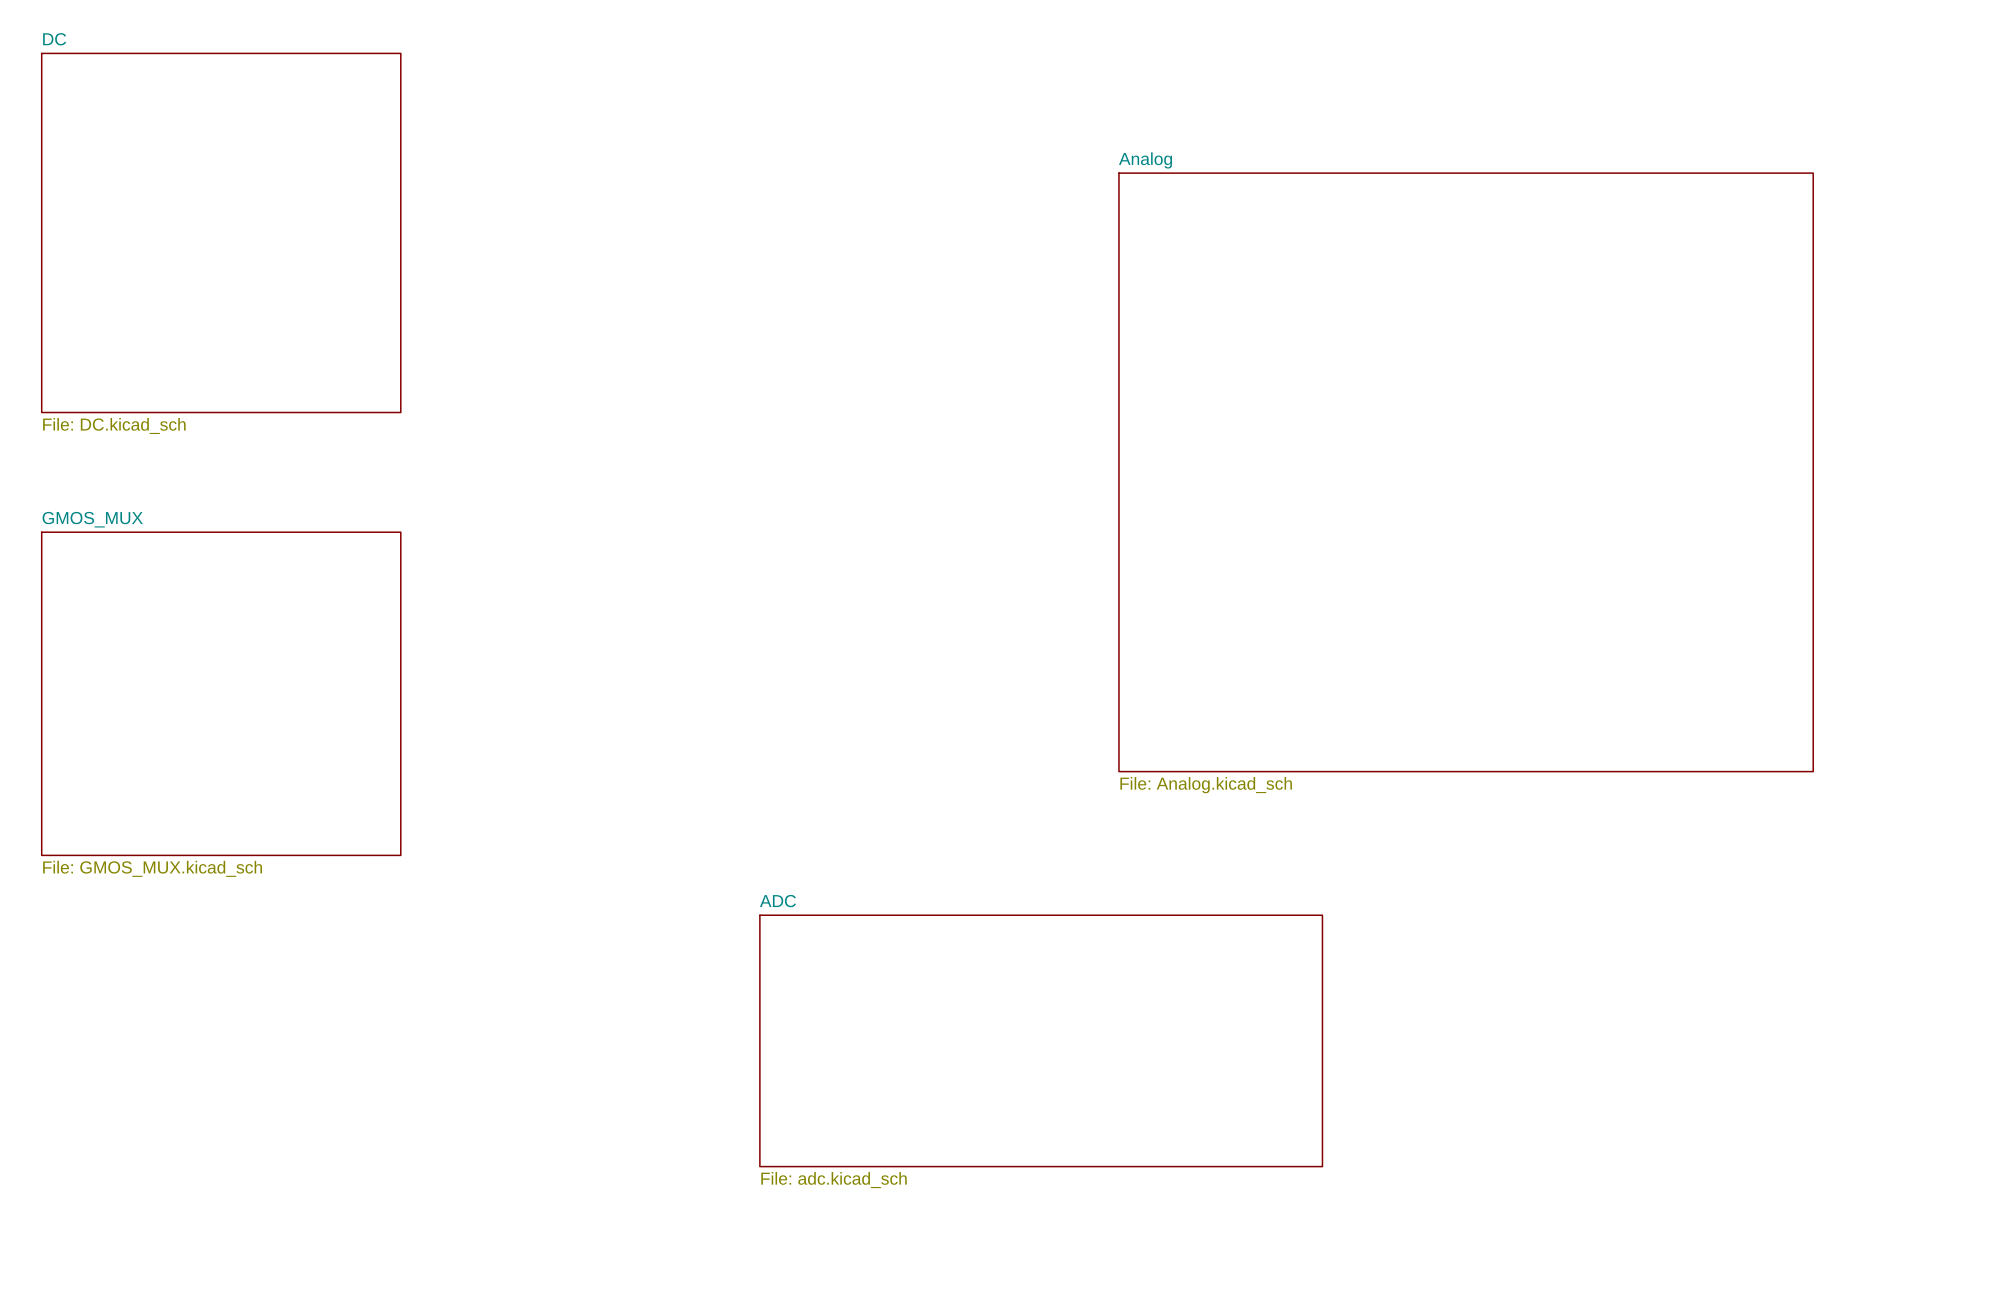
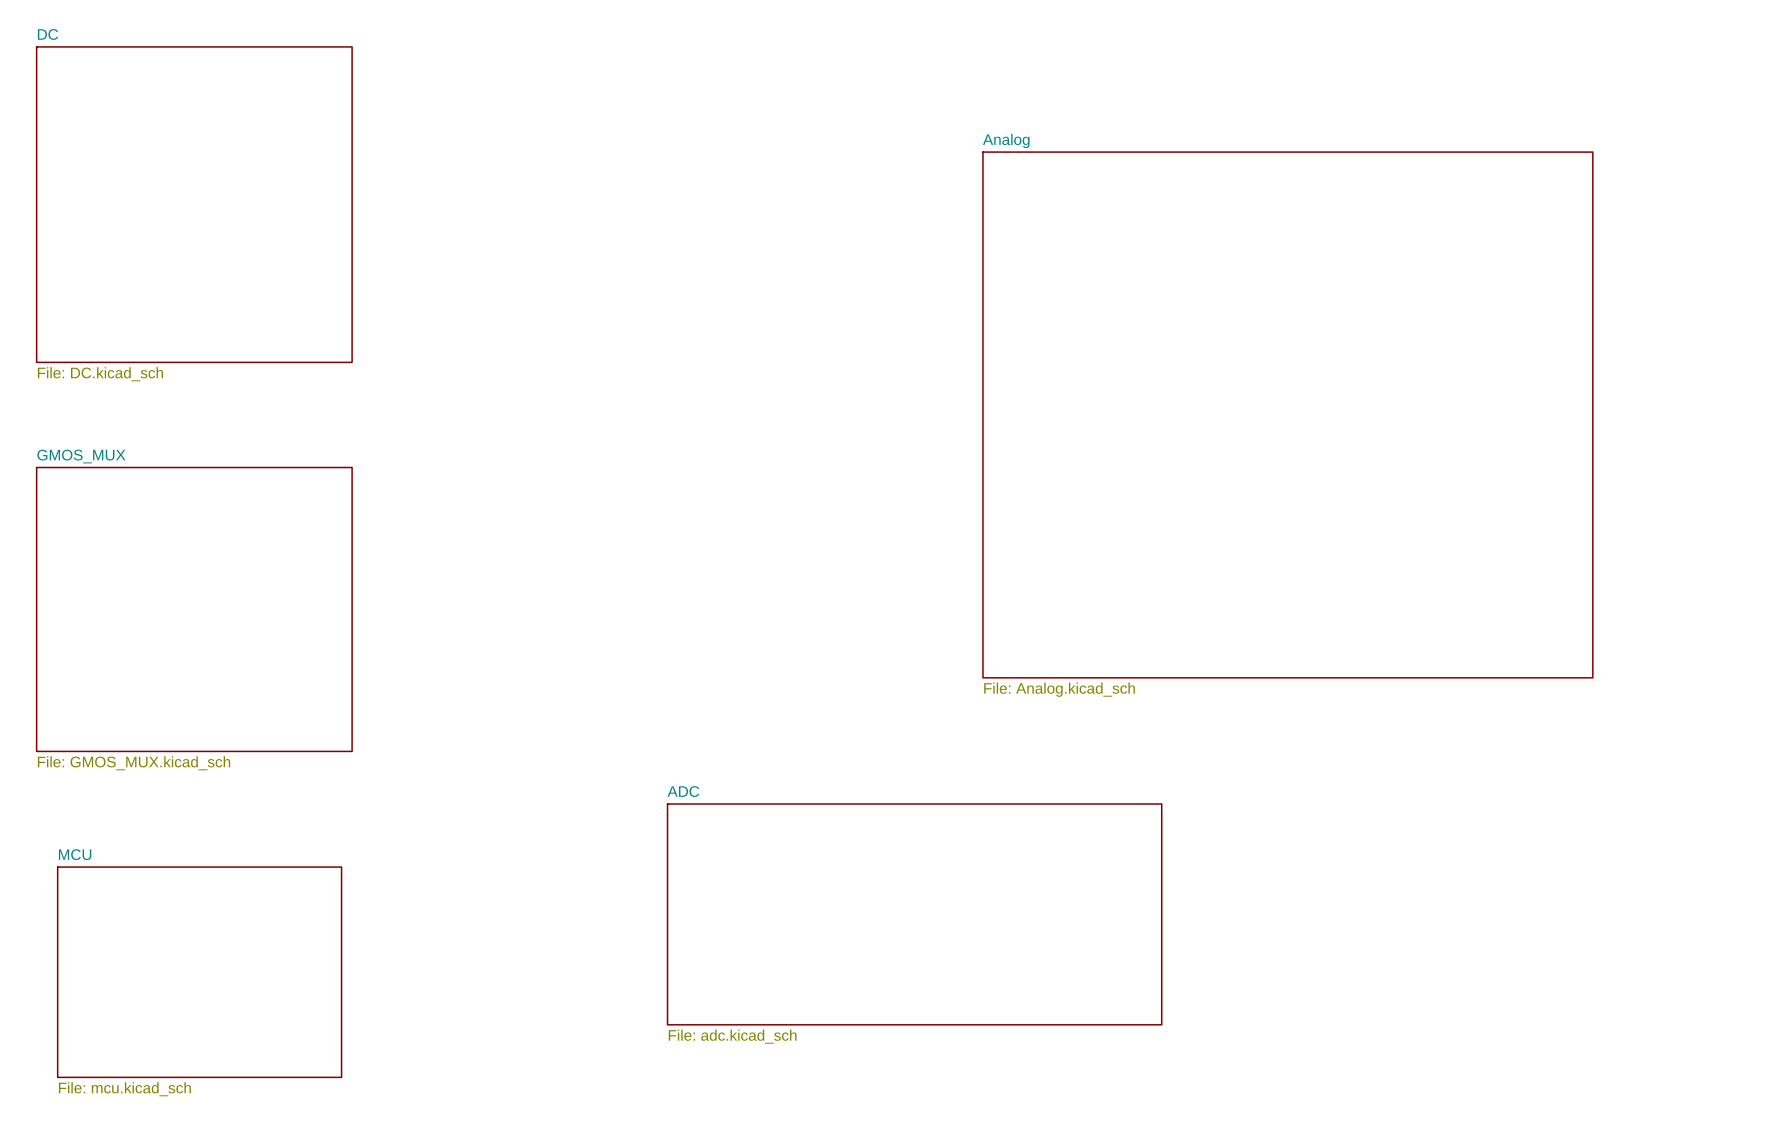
sheet MCU: none -> File: mcu.kicad_sch (199, 972)

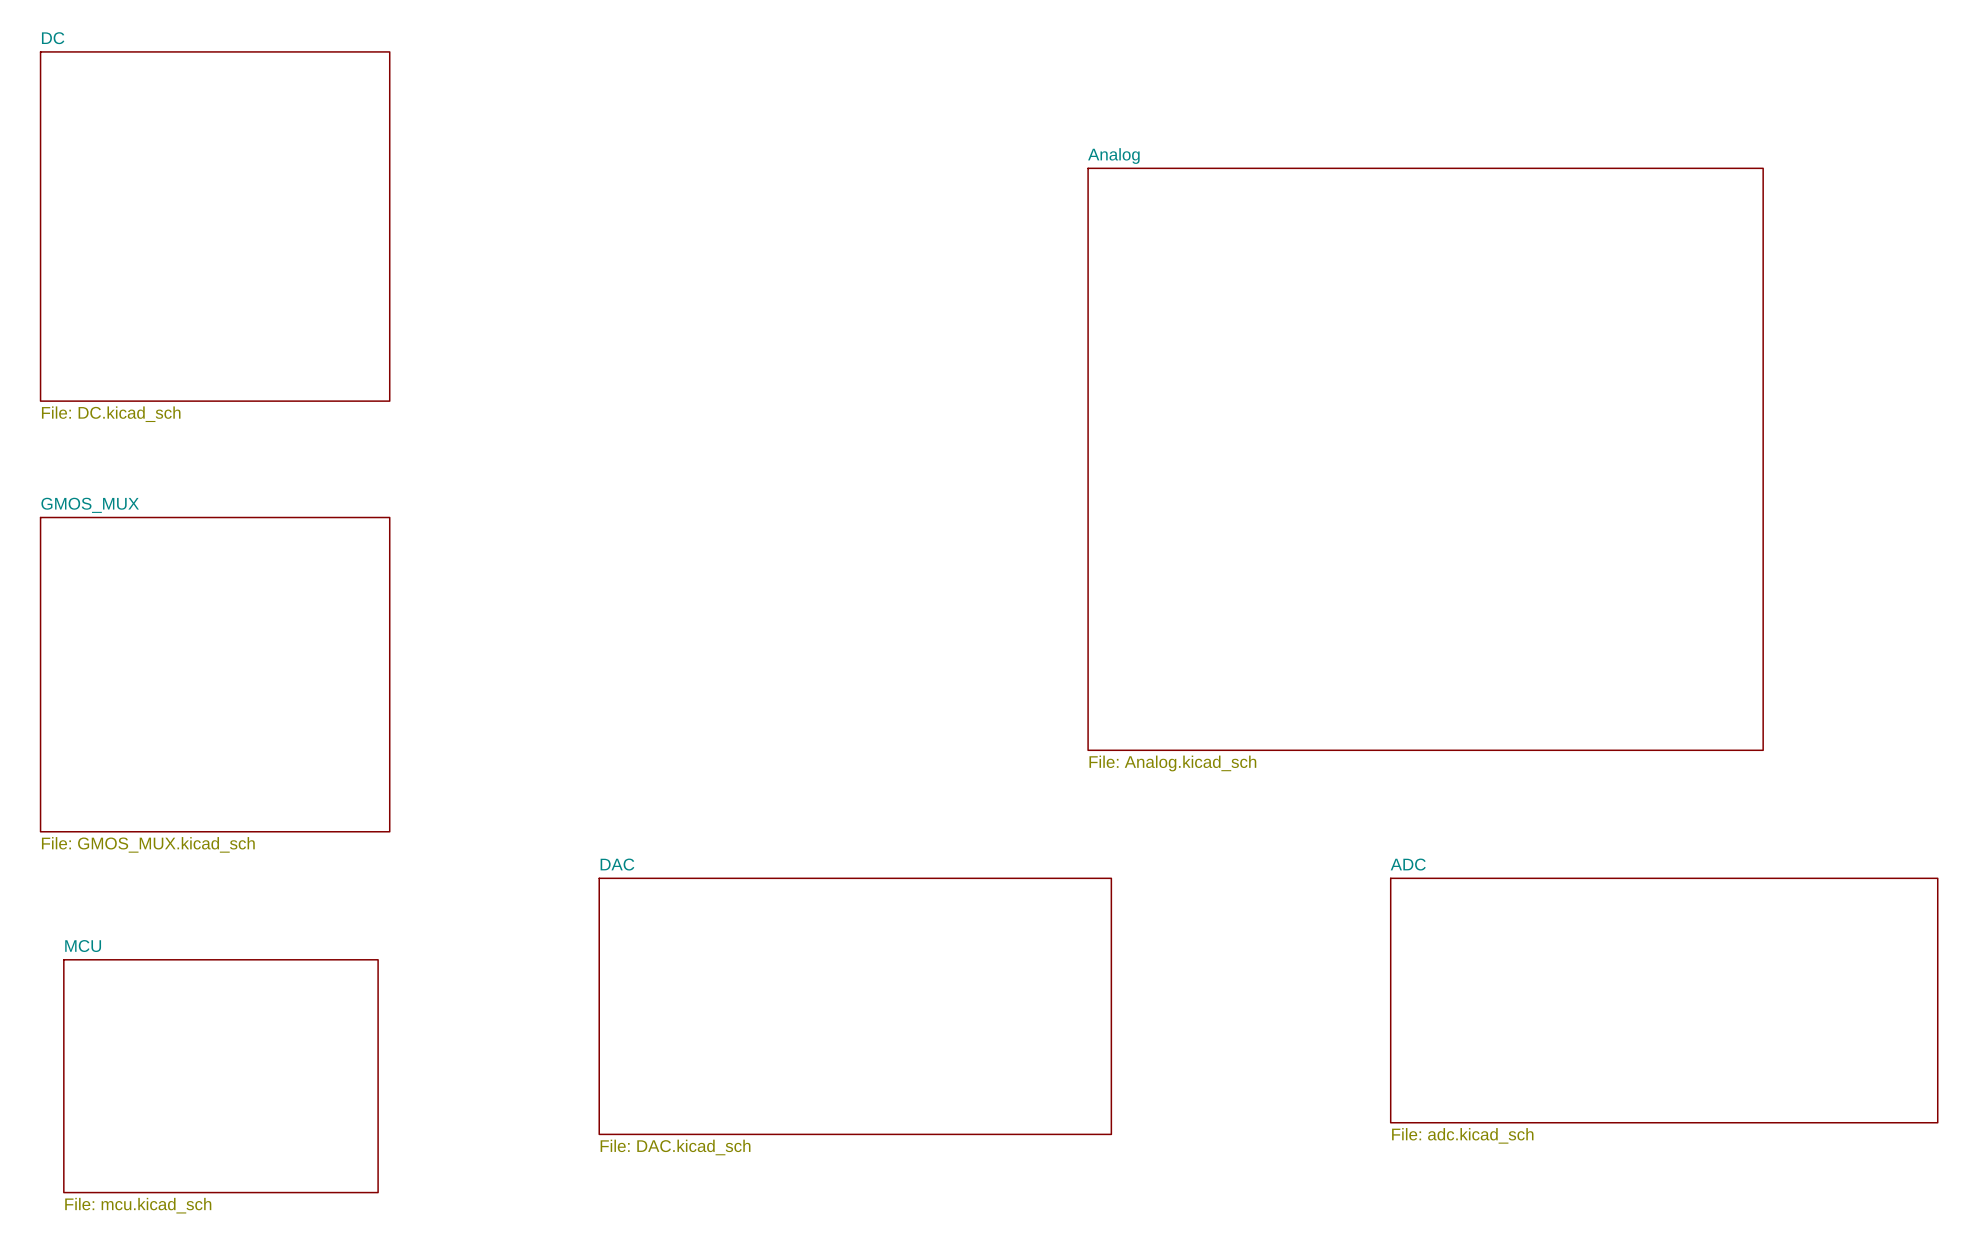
sheet ADC: none -> File: adc.kicad_sch (1664, 1000)
sheet DAC: none -> File: DAC.kicad_sch (855, 1006)
sheet ADC: File: adc.kicad_sch (914, 914) -> none

